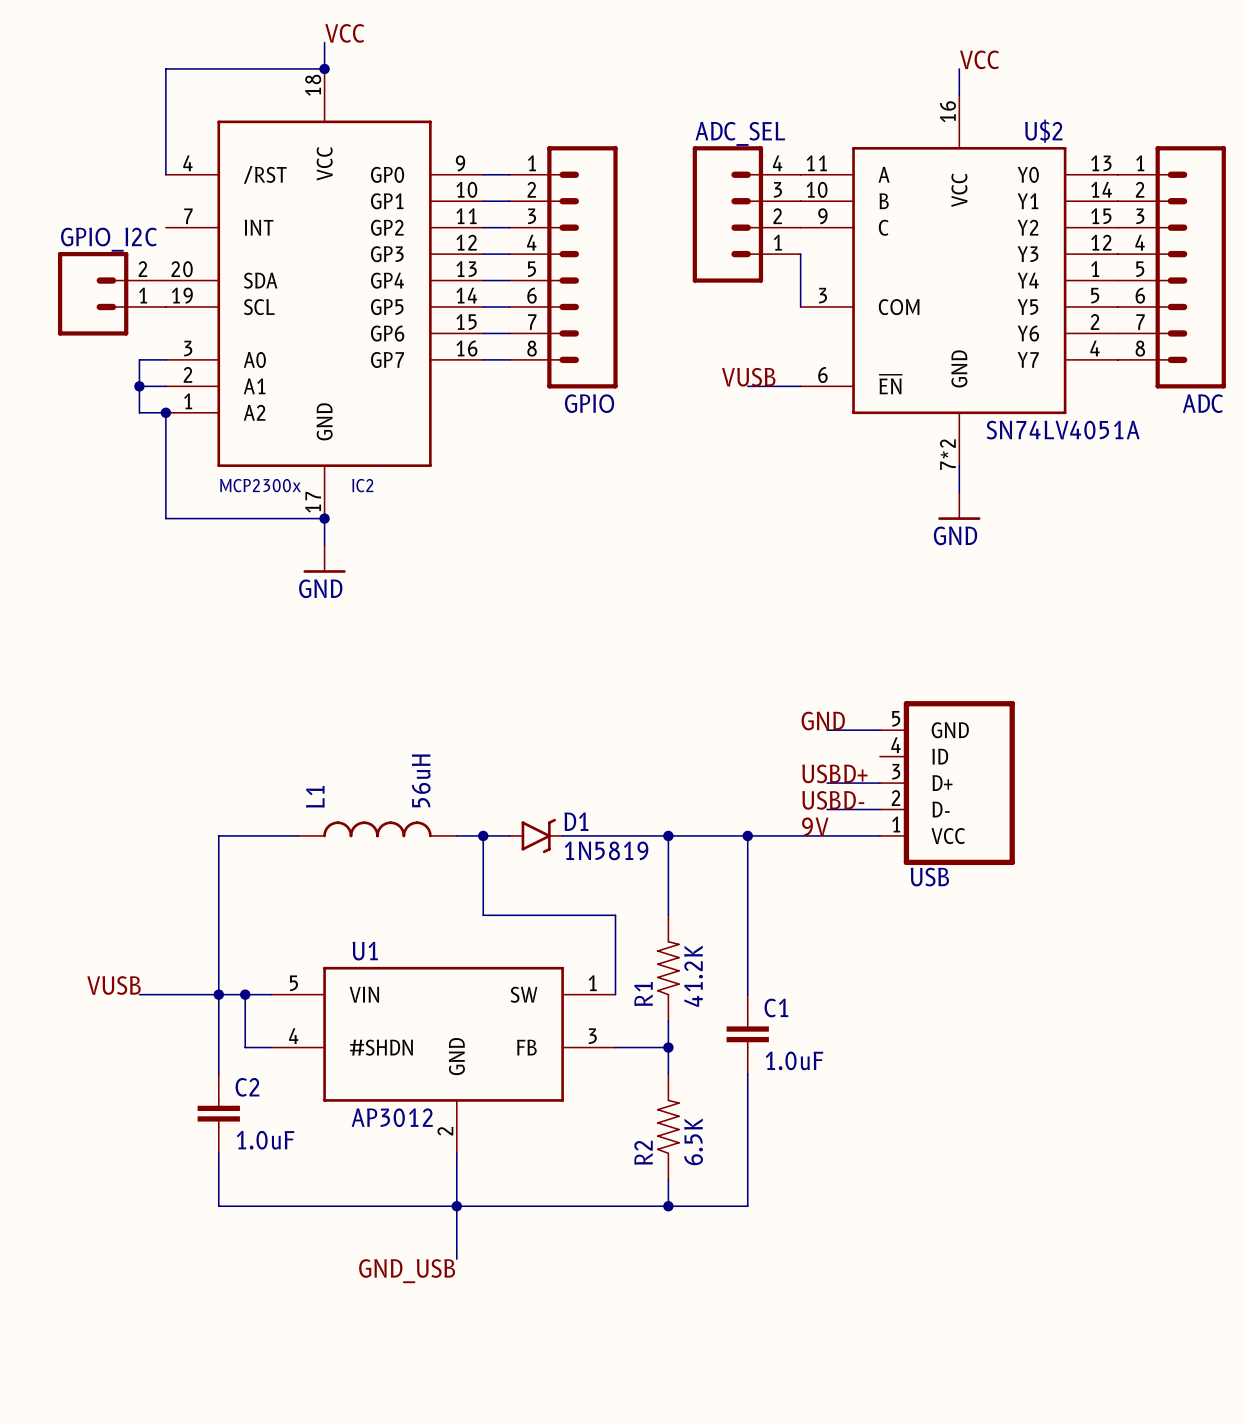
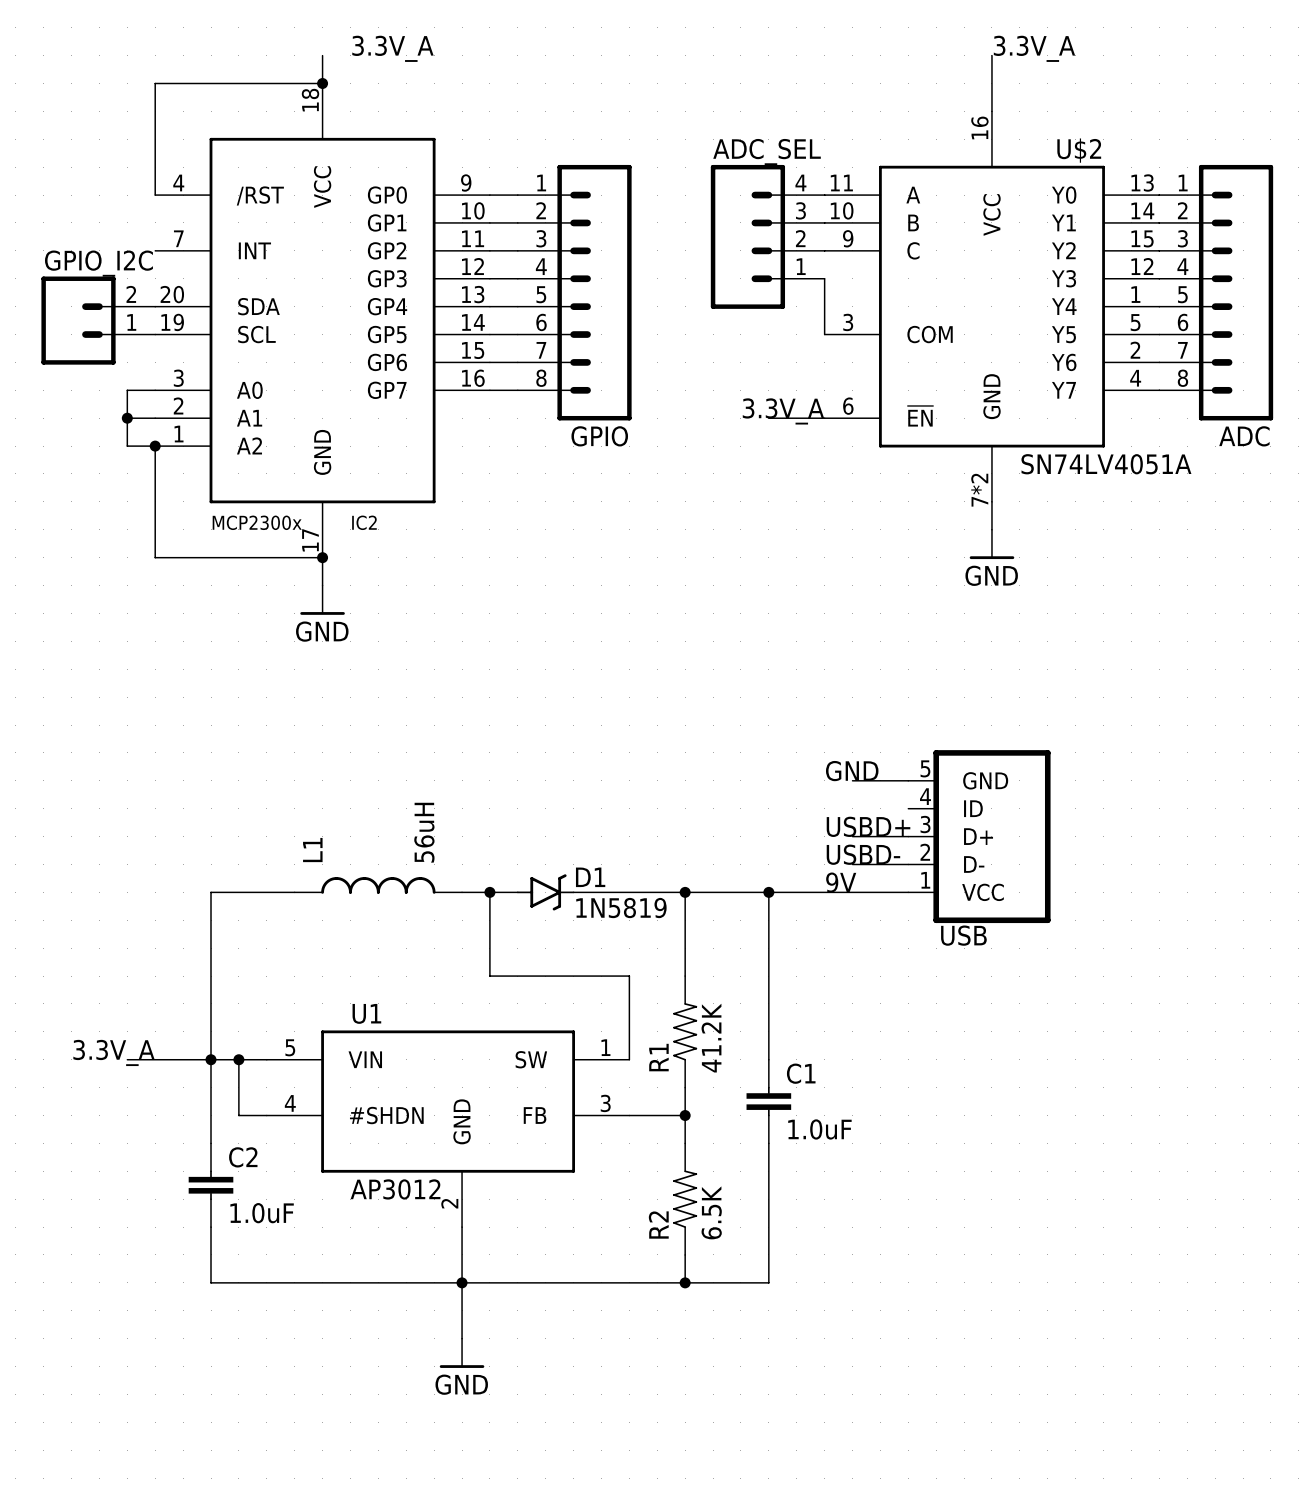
label: VCC (344, 33) -> none
label: none -> 3.3V_A (392, 48)
label: none -> 3.3V_A (1034, 48)
wire: none -> (991, 55) (991, 83)
label: VCC (979, 59) -> none
label: VUSB (748, 377) -> 3.3V_A (783, 411)
label: VUSB (113, 985) -> 3.3V_A (114, 1052)
label: GND_USB (407, 1271) -> none
power symbol: none -> GND (462, 1353)

